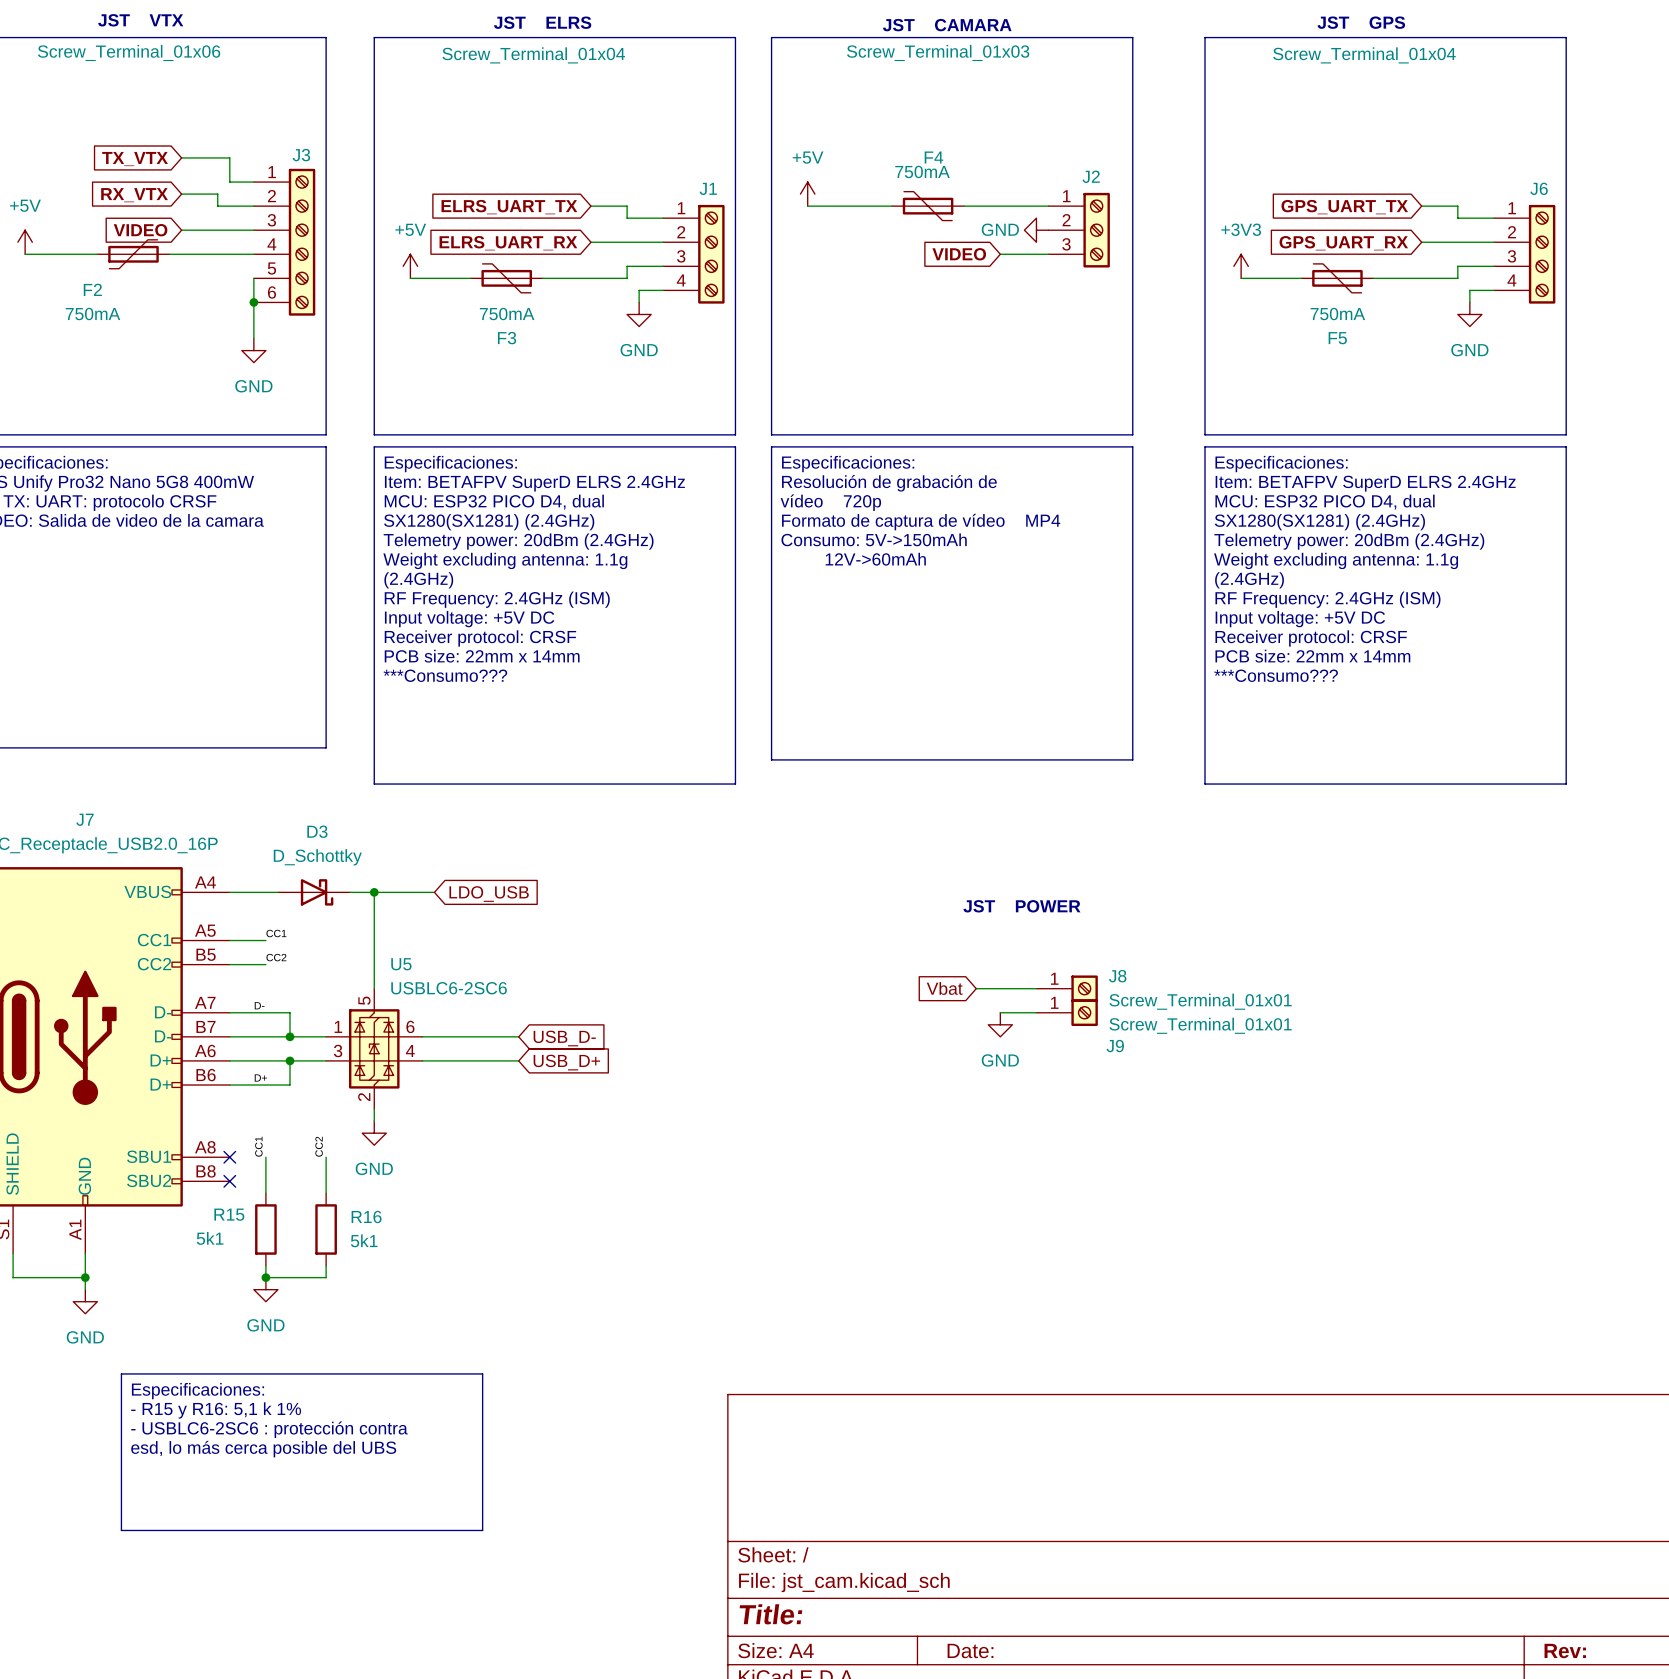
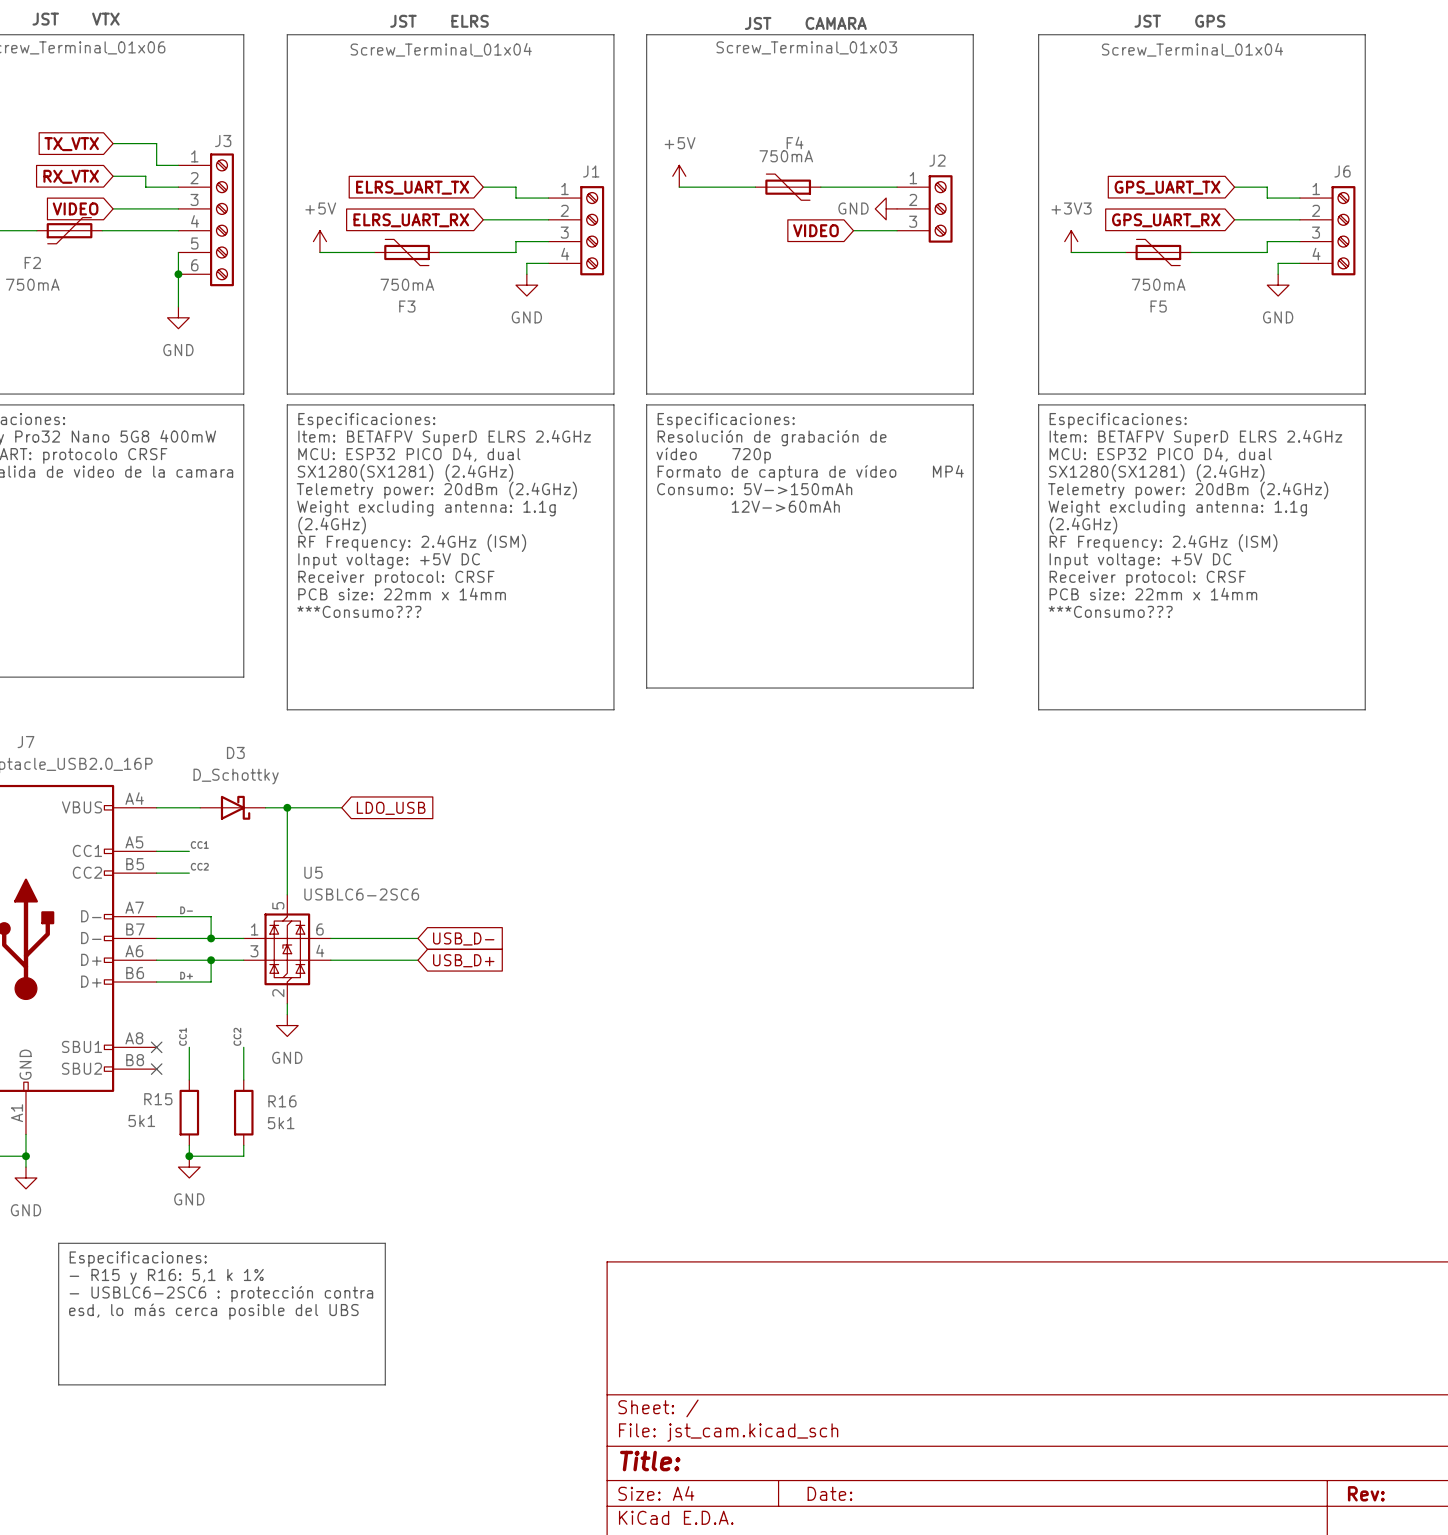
text: JST POWER (1021, 906) -> none
global label: Vbat (944, 988) -> none
wire: (976, 988) (1036, 988) -> none
J8: Screw_Terminal_01x01 (1067, 988) -> none
wire: (1000, 1012) (1036, 1012) -> none
J9: Screw_Terminal_01x01 (1067, 1012) -> none
power symbol: GND (1000, 1024) -> none

